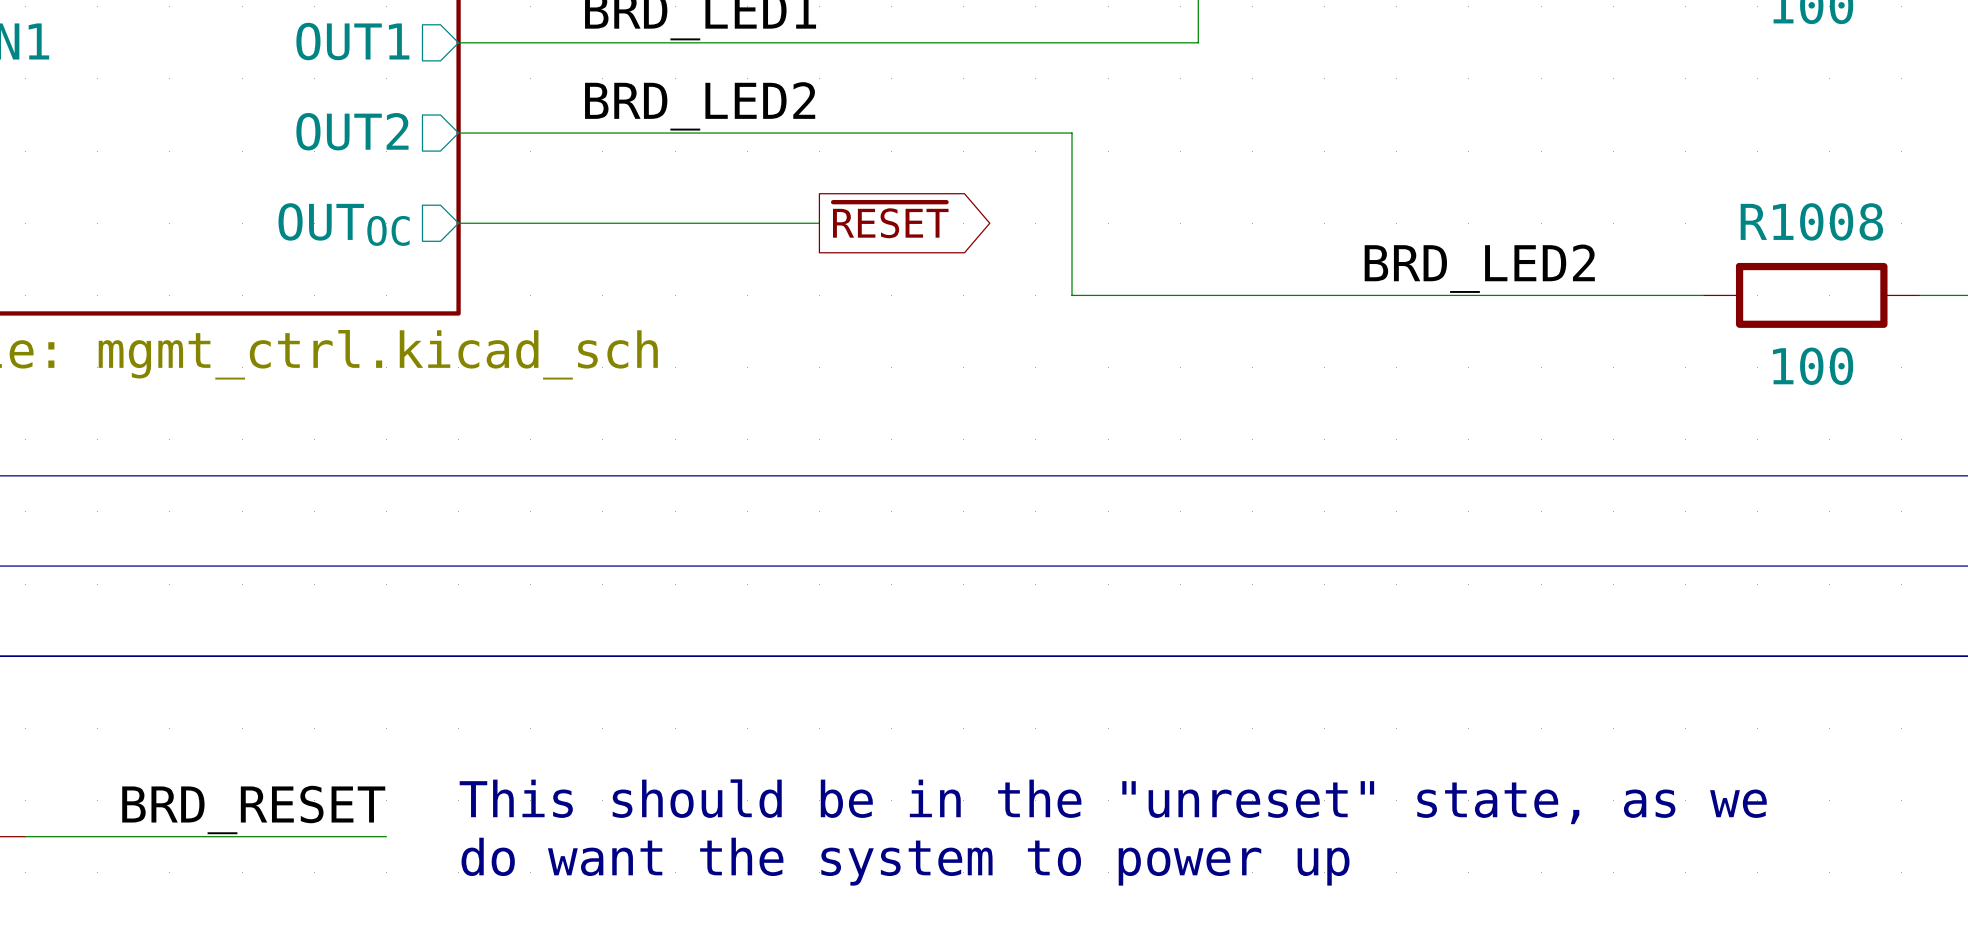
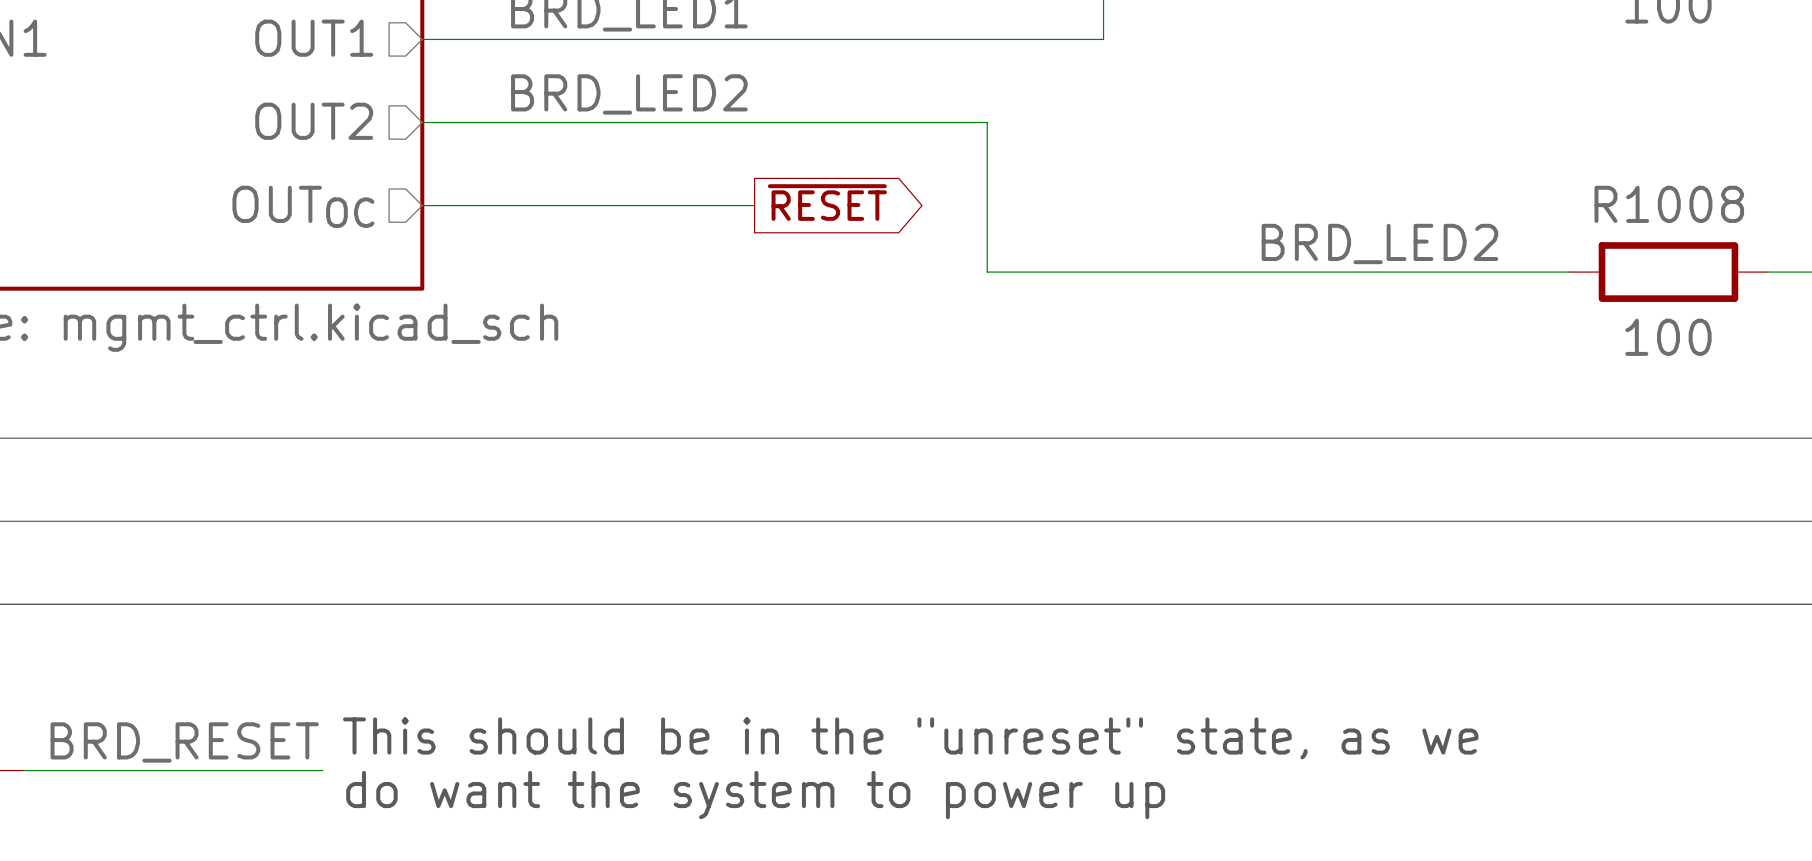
text position: This should be in the "unreset" state, as we (1113, 801) -> This should be in the "unreset" state, as we (910, 738)
label position: BRD_RESET (253, 809) -> BRD_RESET (184, 742)
wire: (350, 836) (386, 836) -> none
text position: do want the system to power up (905, 861) -> do want the system to power up (755, 795)

